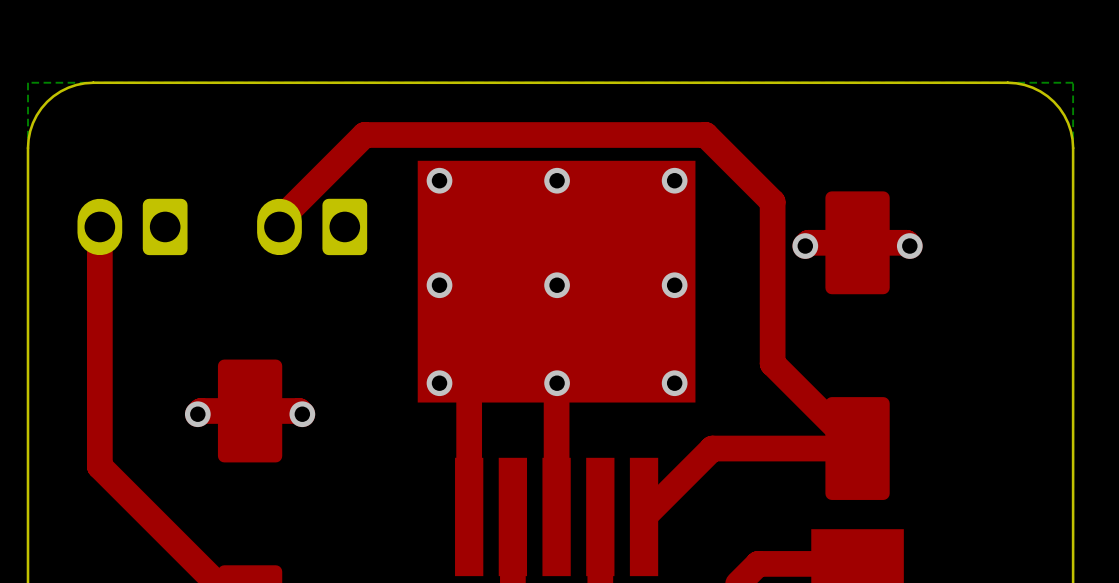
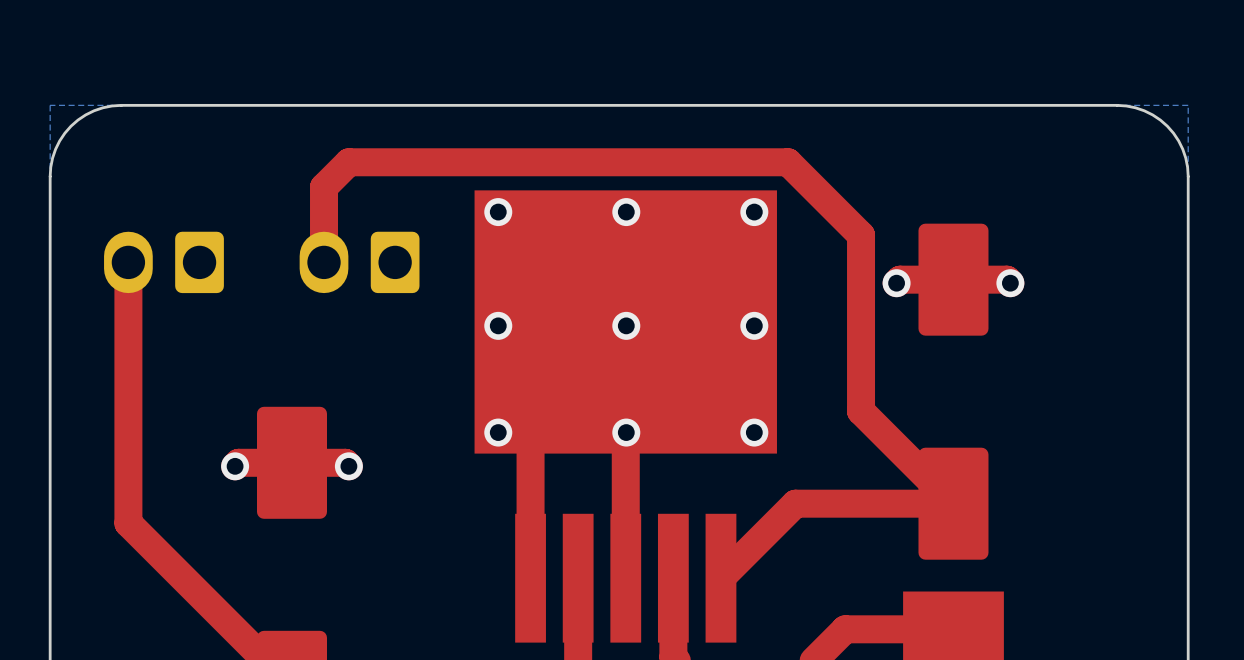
top track: (364, 135) (279, 220) -> (416, 162) (348, 162) (324, 187) (324, 254)

